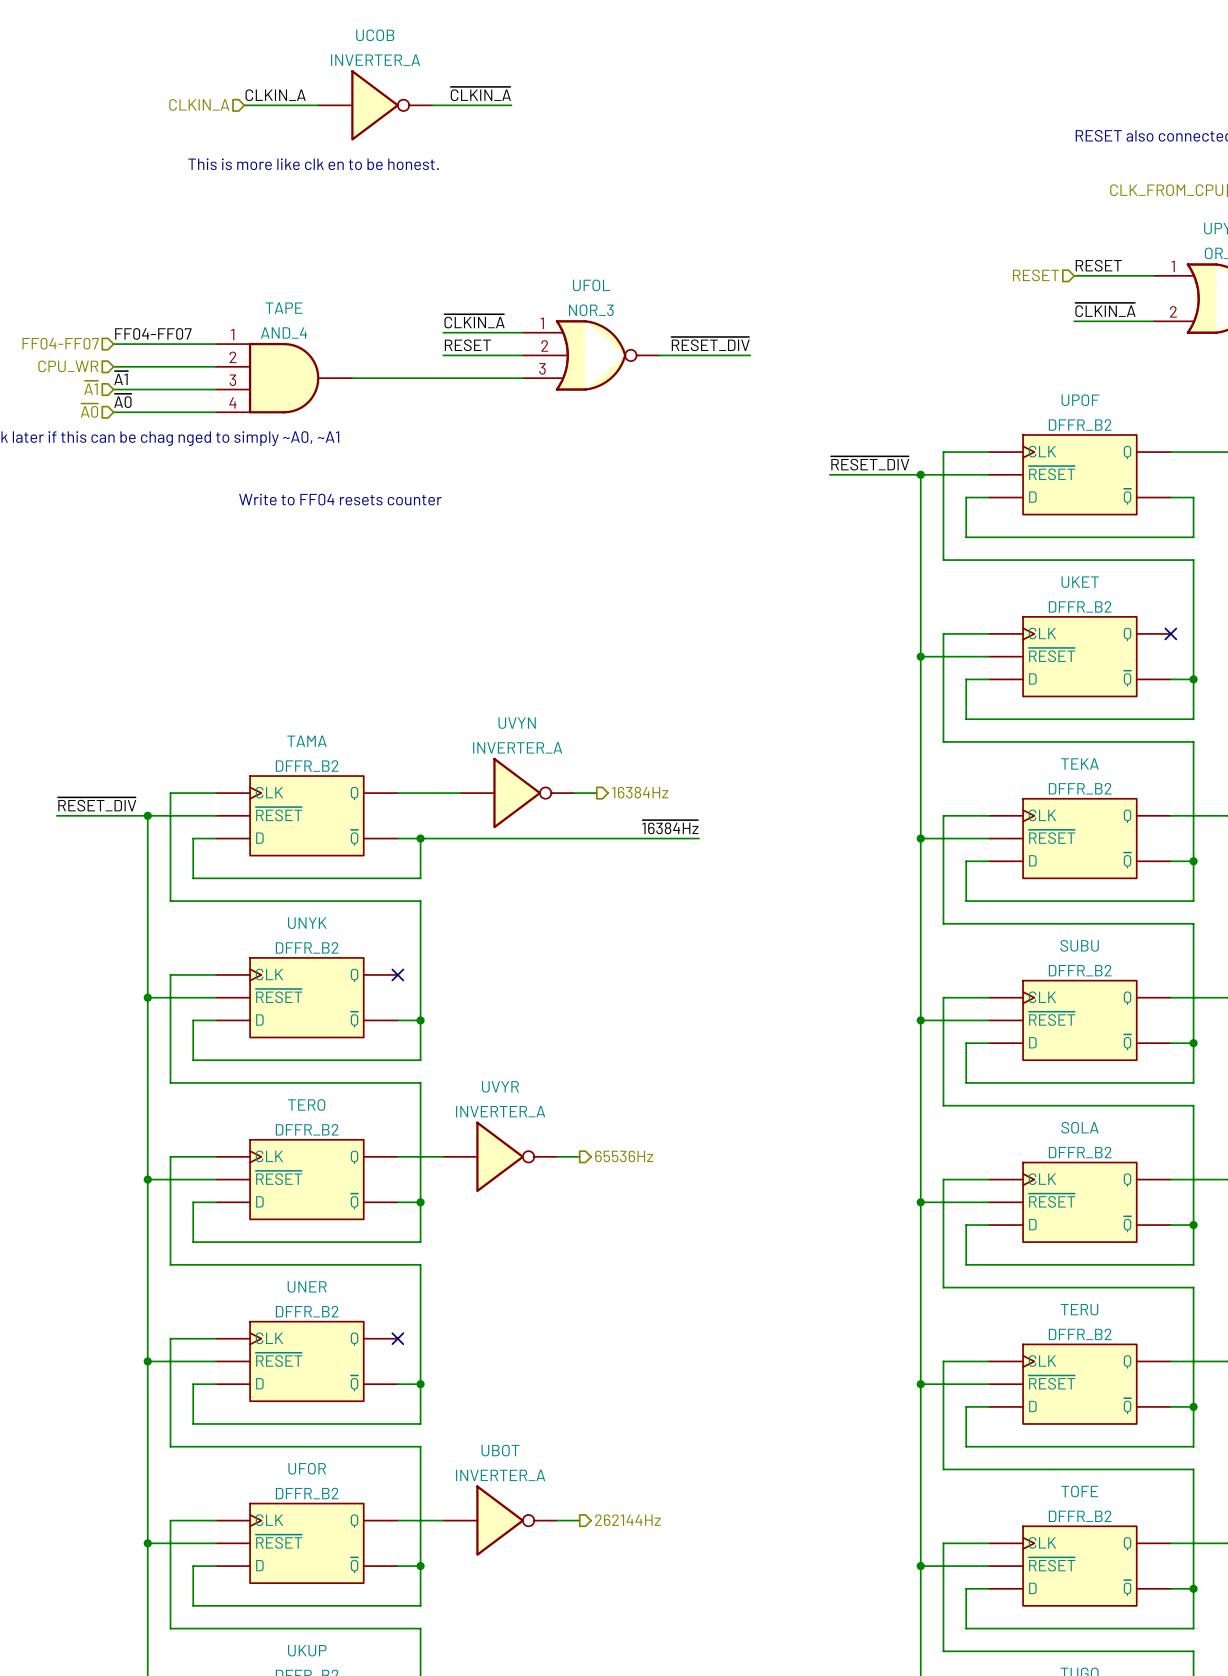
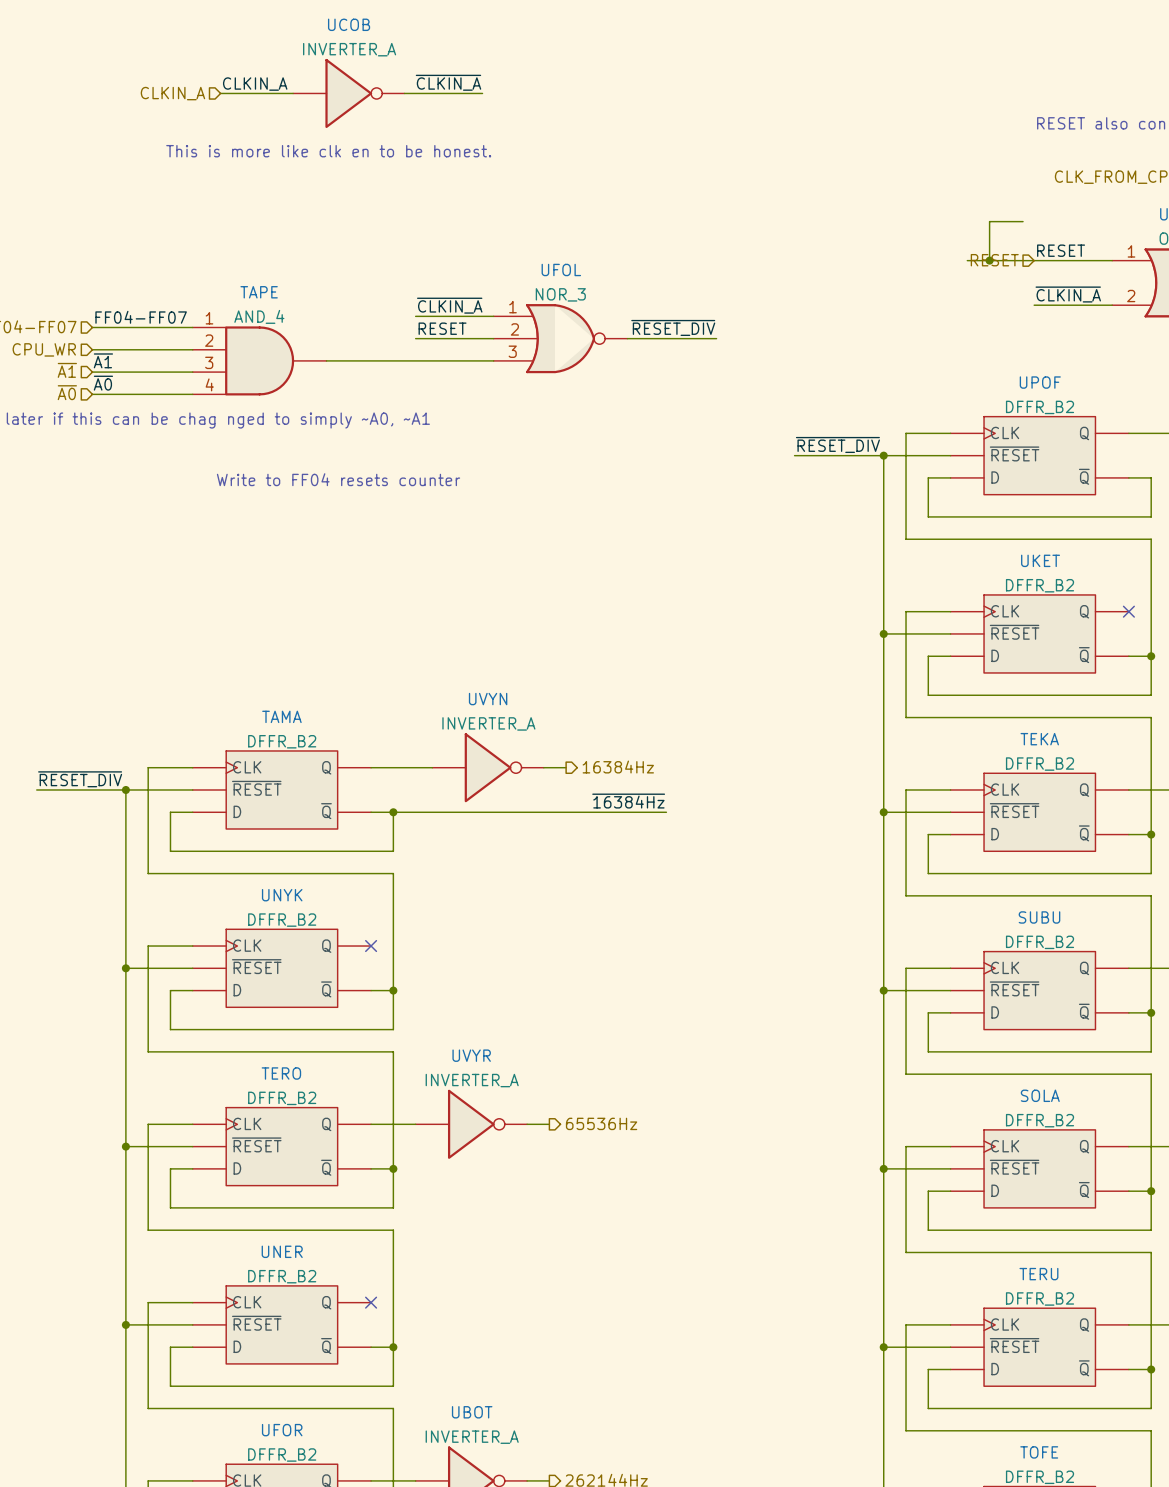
wire: none -> (1023, 221) (989, 221) (989, 260)
wire: none -> (967, 260) (1034, 260)
junction: none -> (989, 260)

